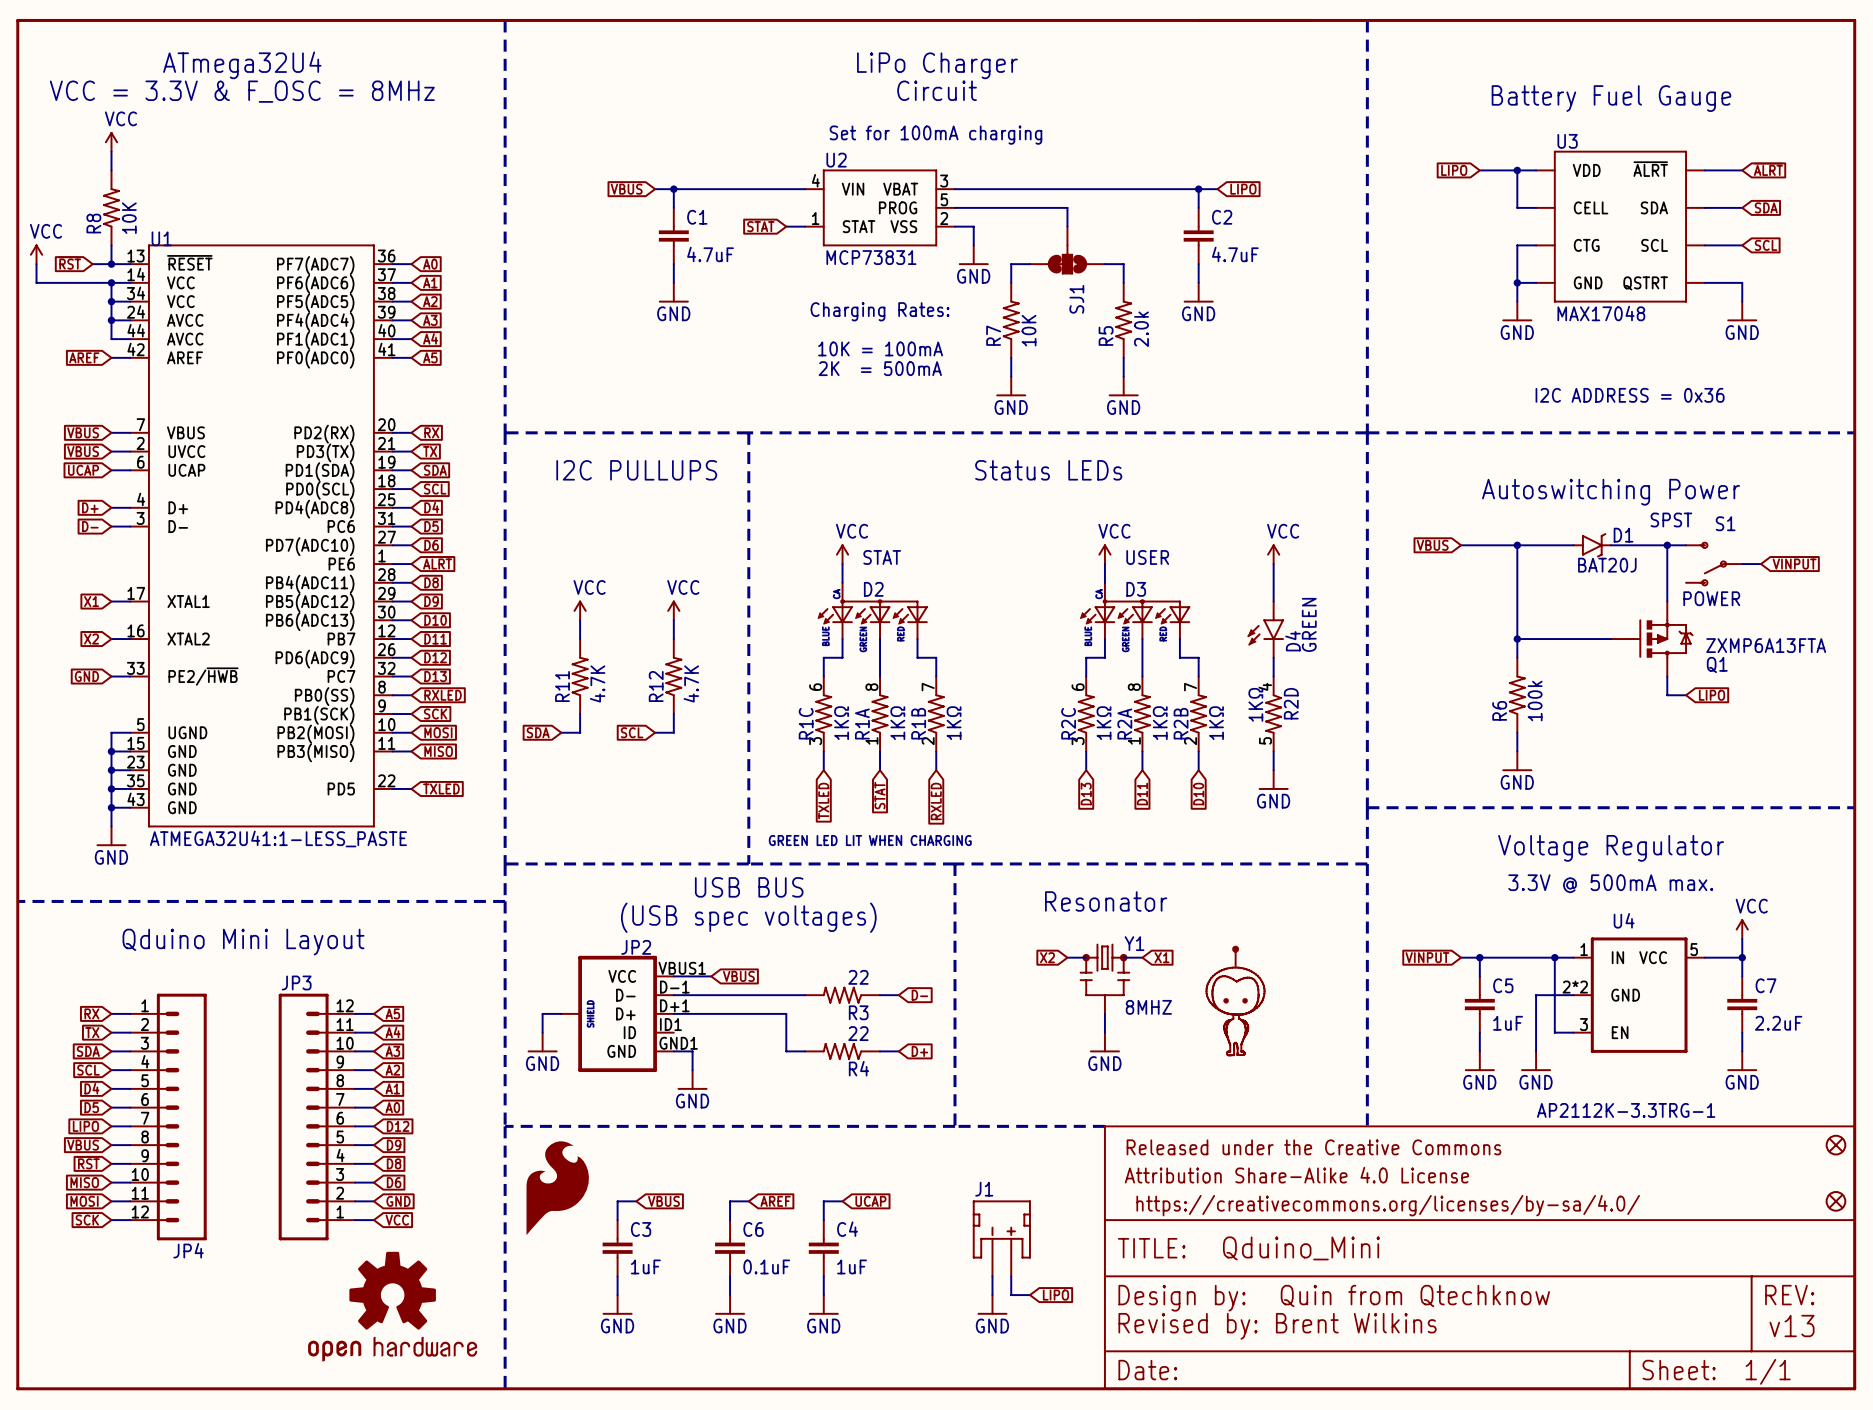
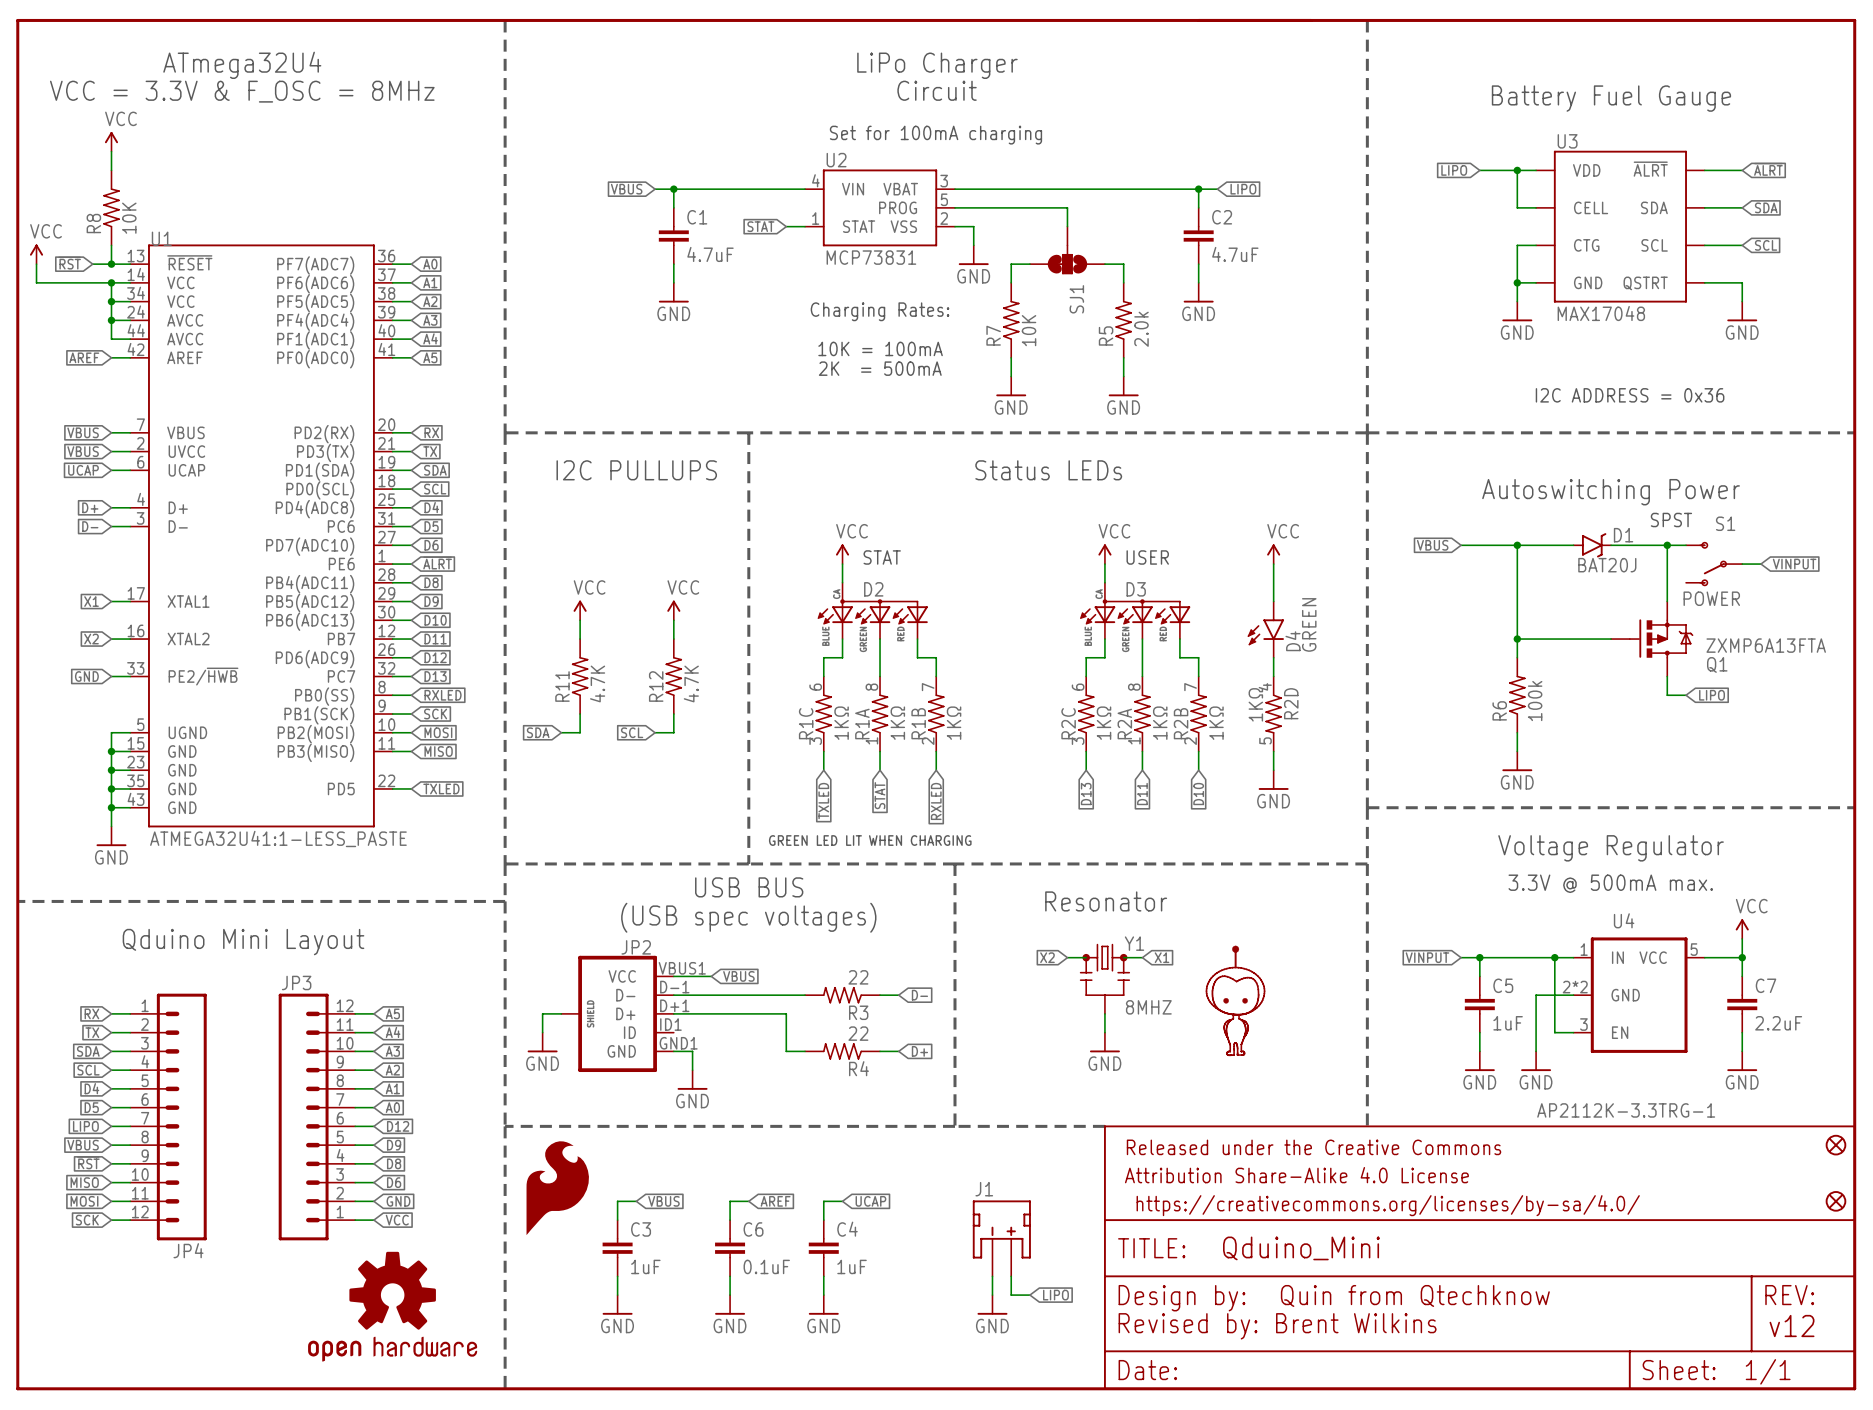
text: v13 (1792, 1326) -> v12 (1792, 1326)

